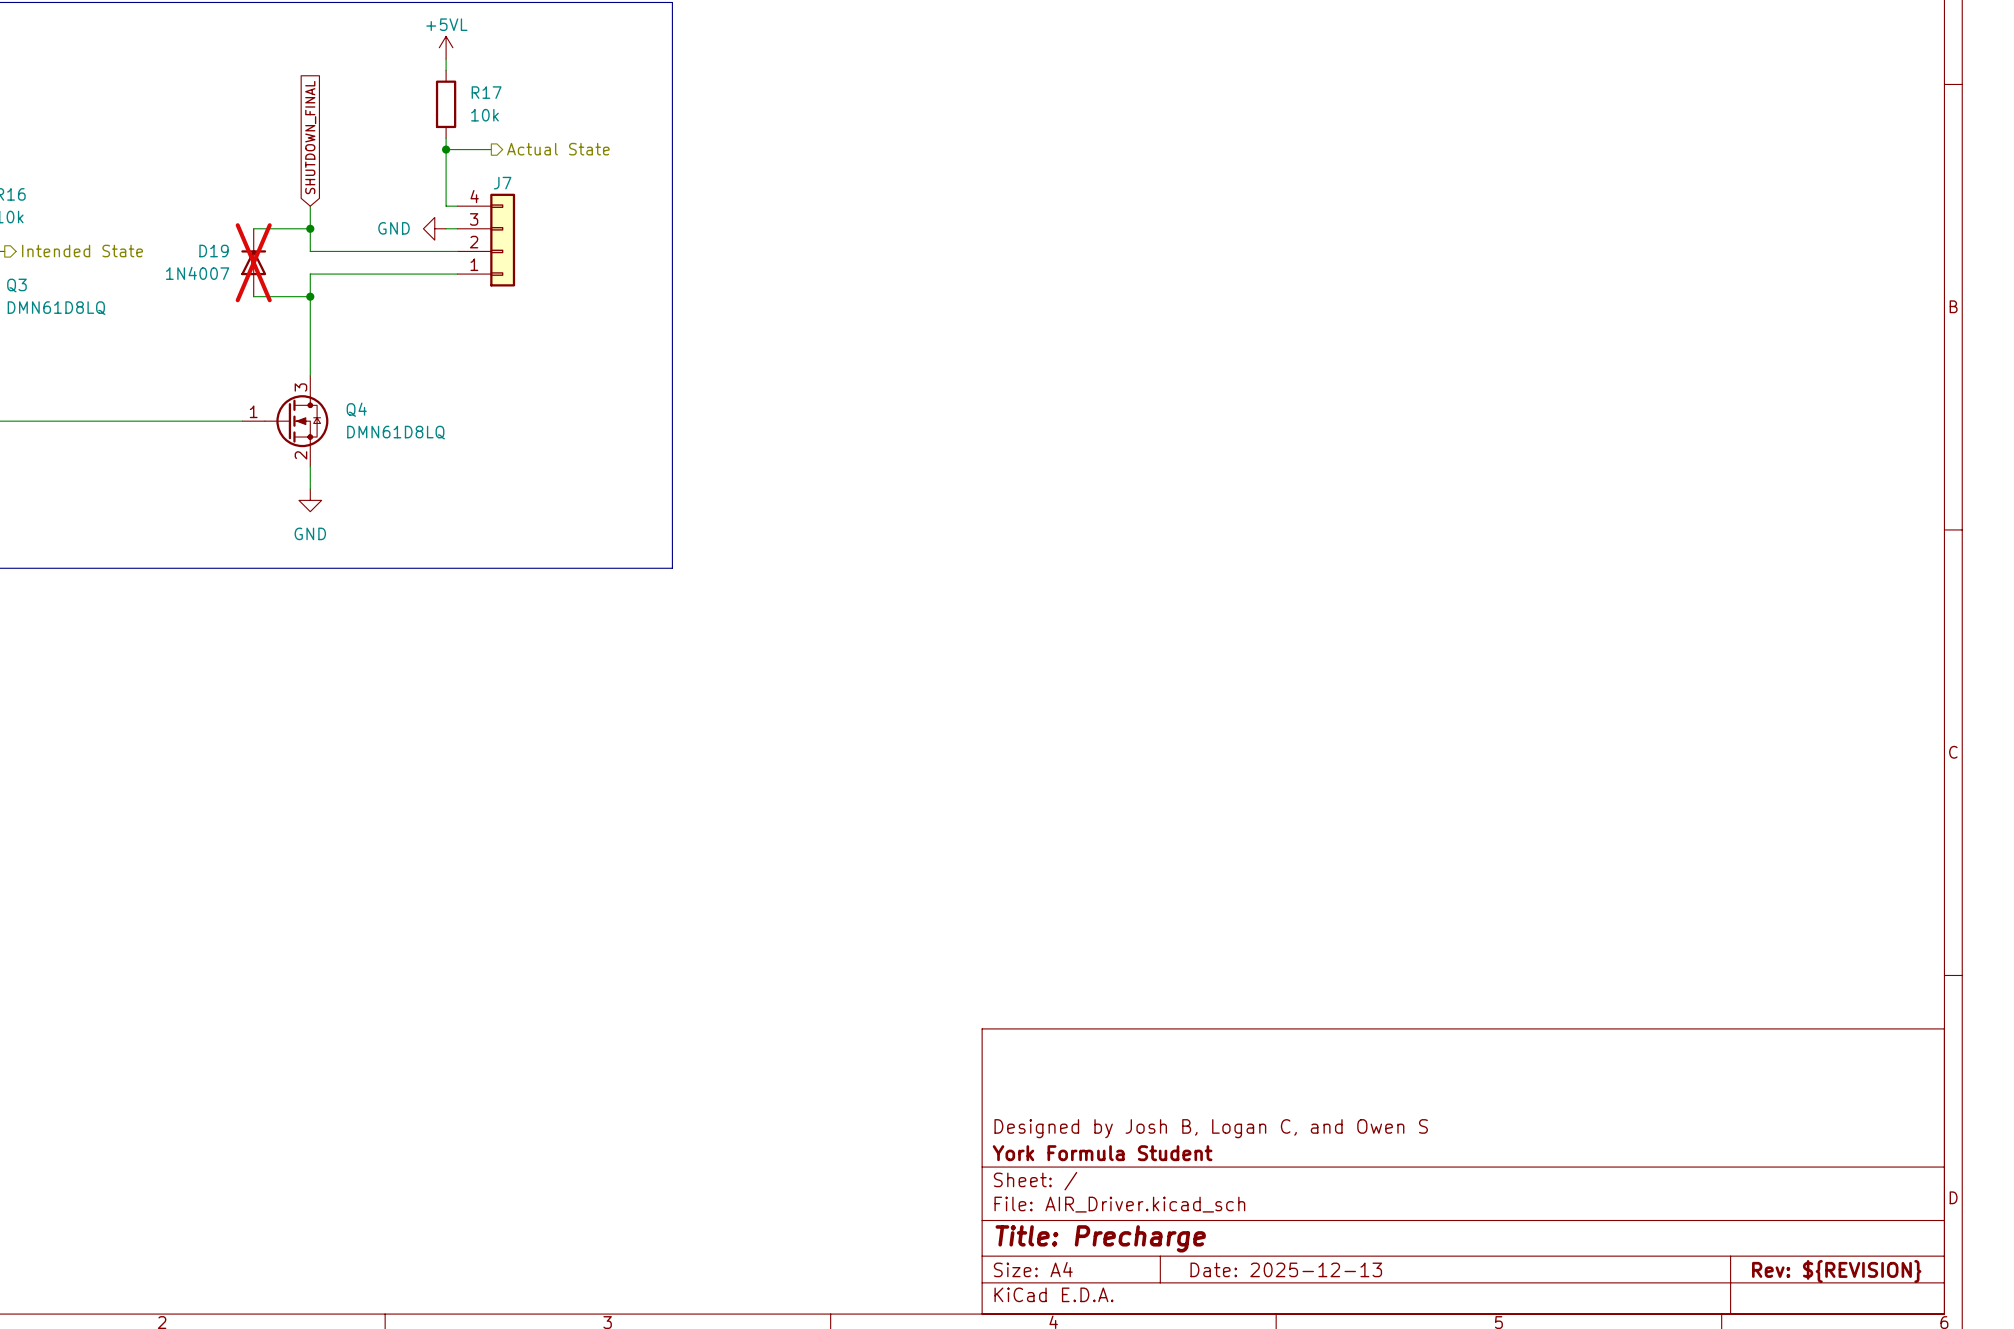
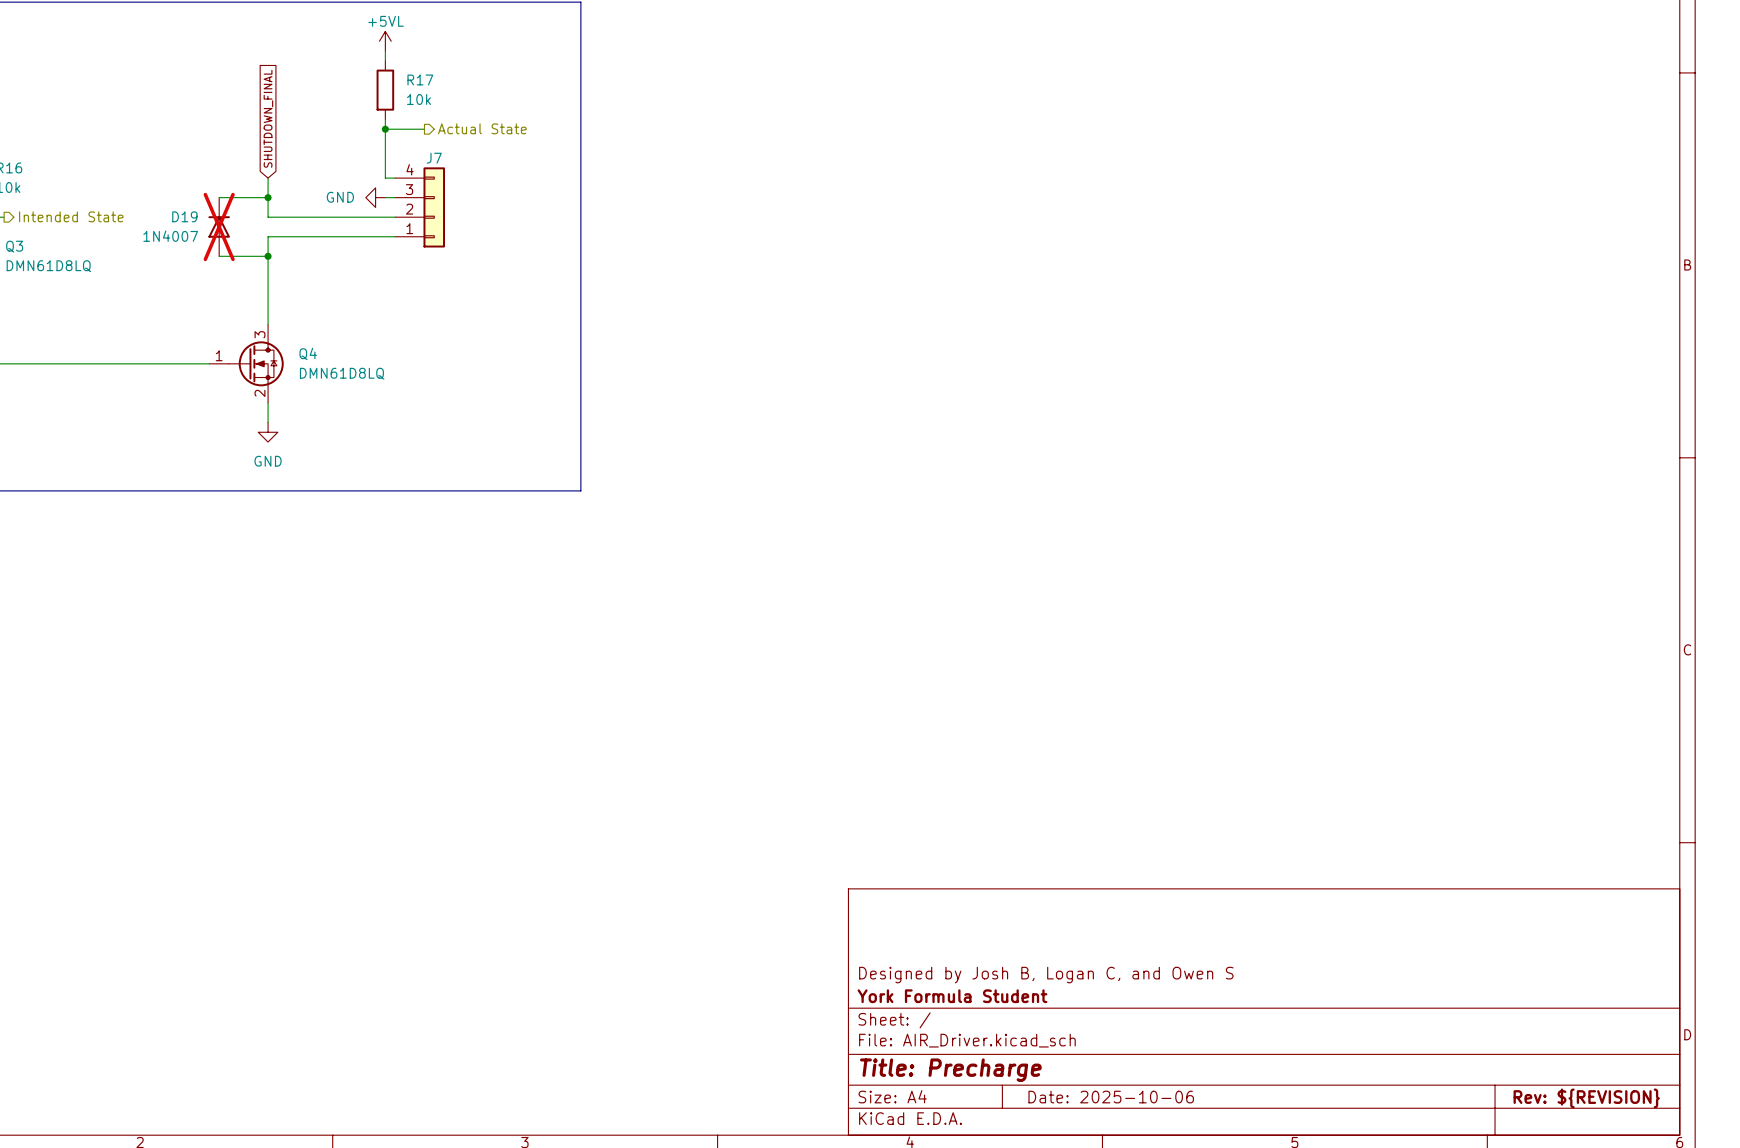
title block: Date: 2025-12-13 (1286, 1269) -> Date: 2025-10-06 (1111, 1097)

